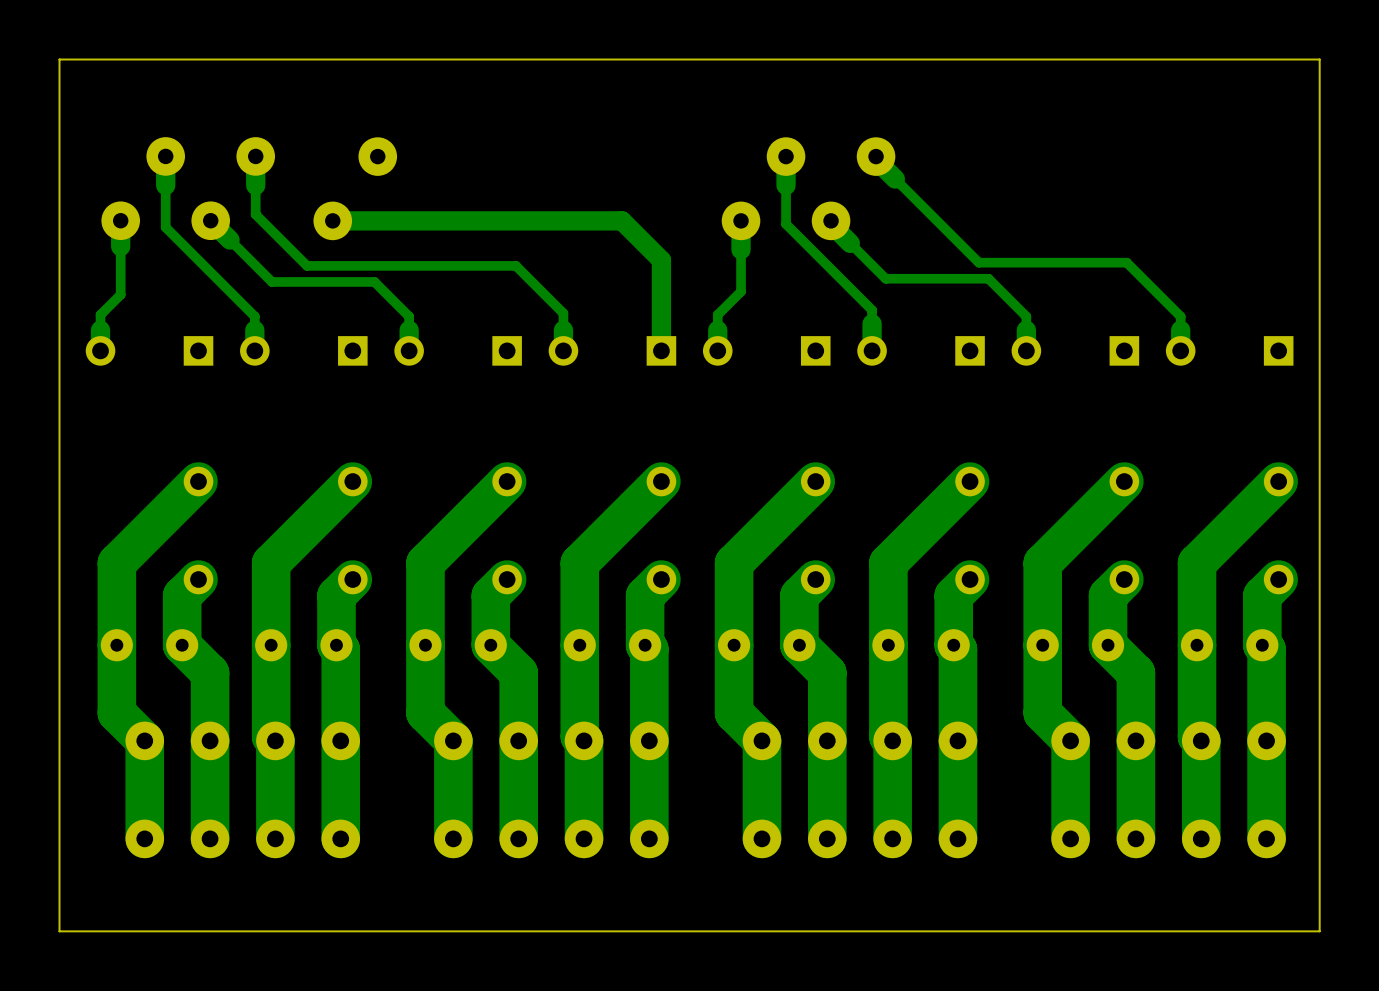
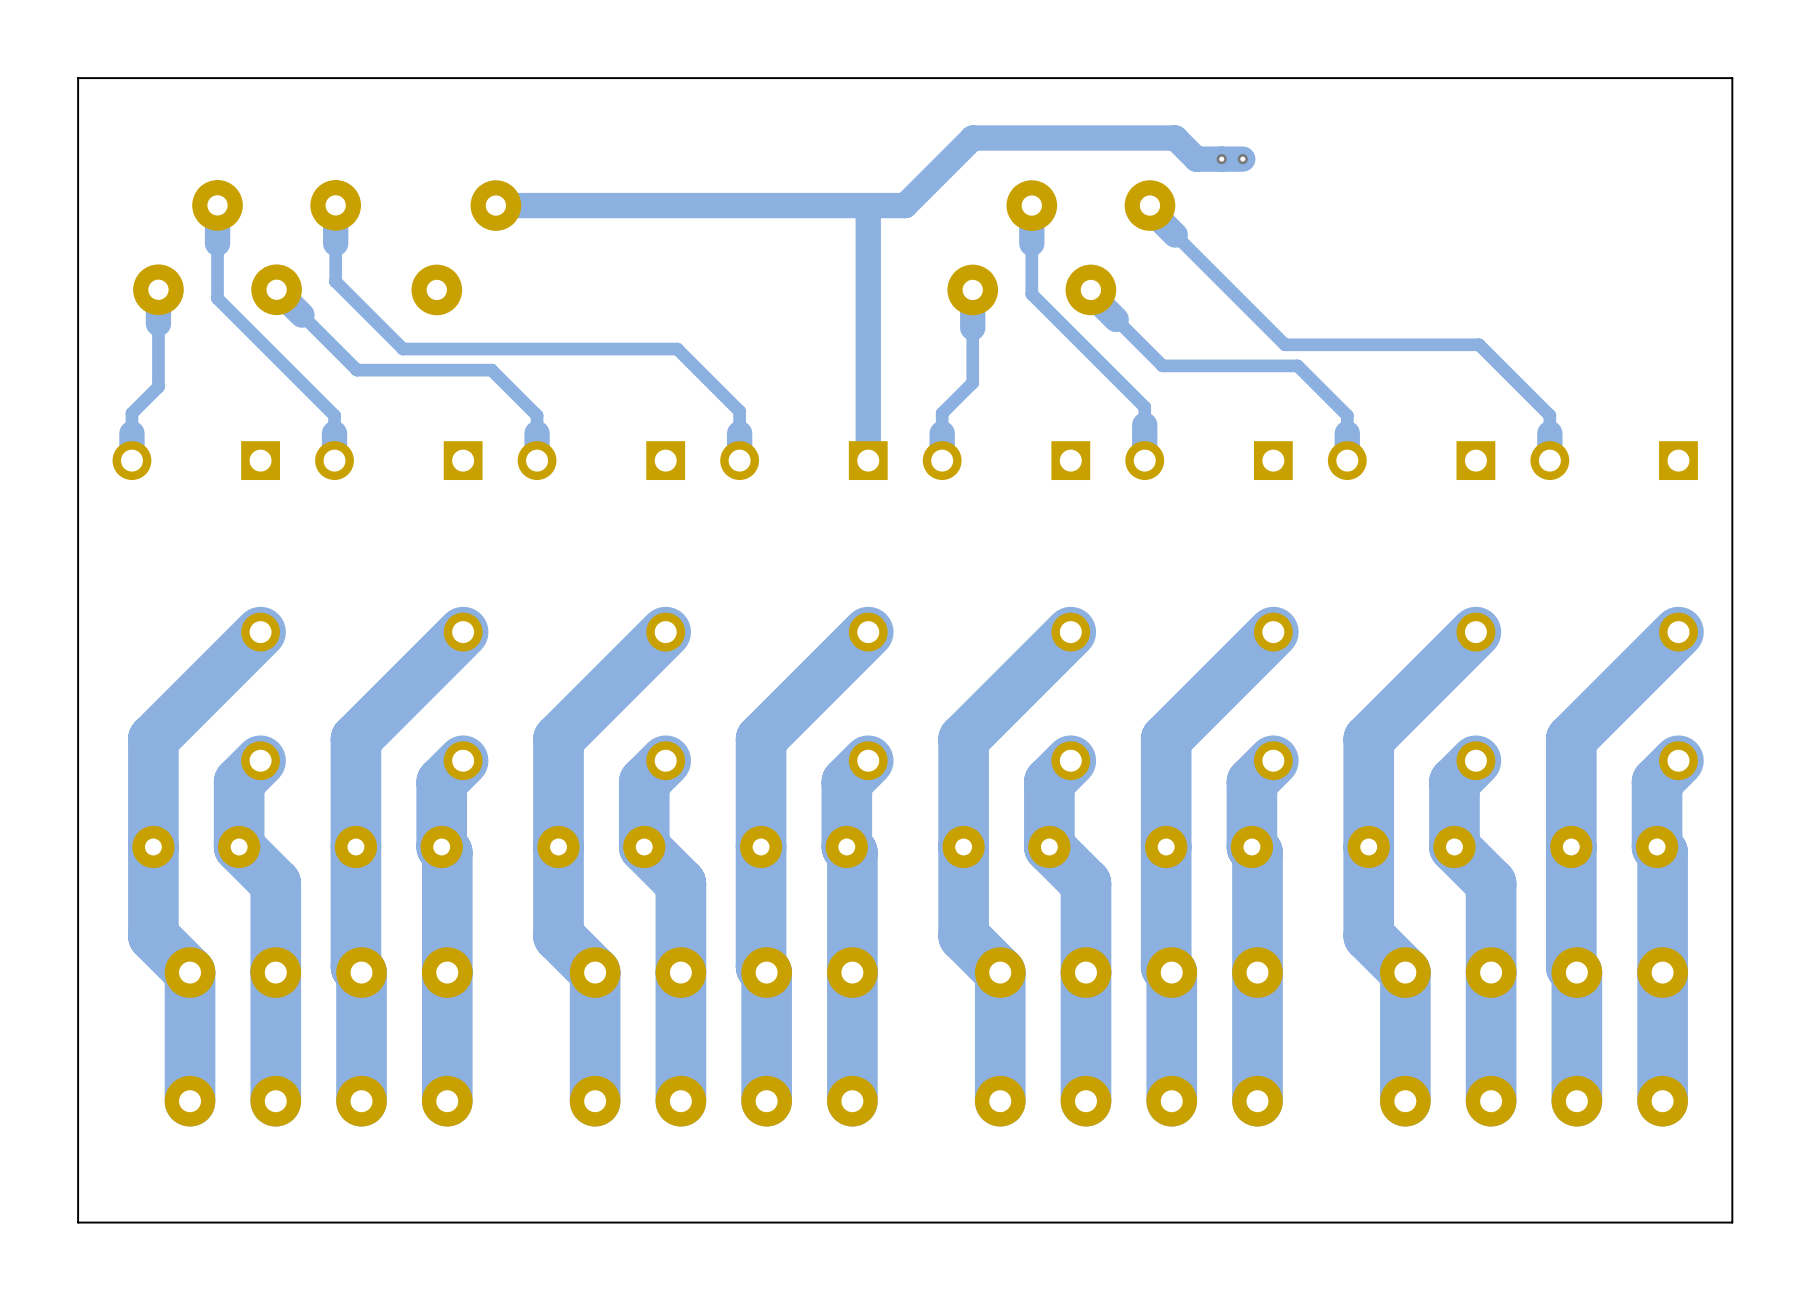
via: none -> (1221, 159)
track: none -> (1242, 159) (1196, 159) (1175, 138) (972, 138) (905, 205) (495, 205)
via: none -> (1242, 159)
track: (332, 220) (622, 220) (661, 260) -> (868, 205) (868, 341)

